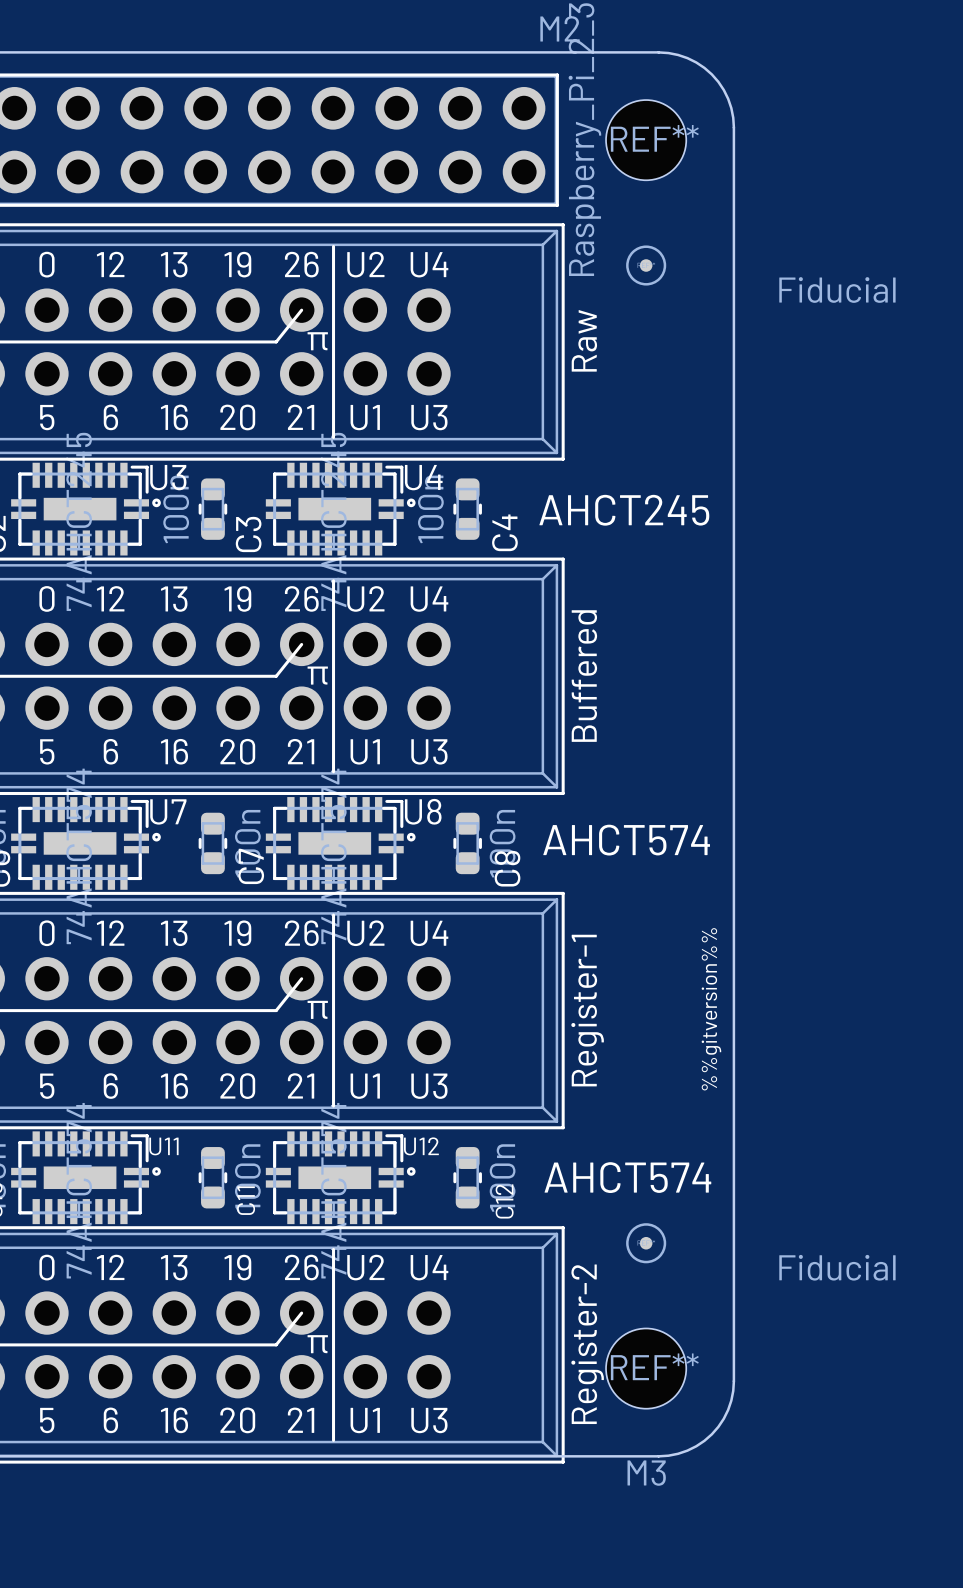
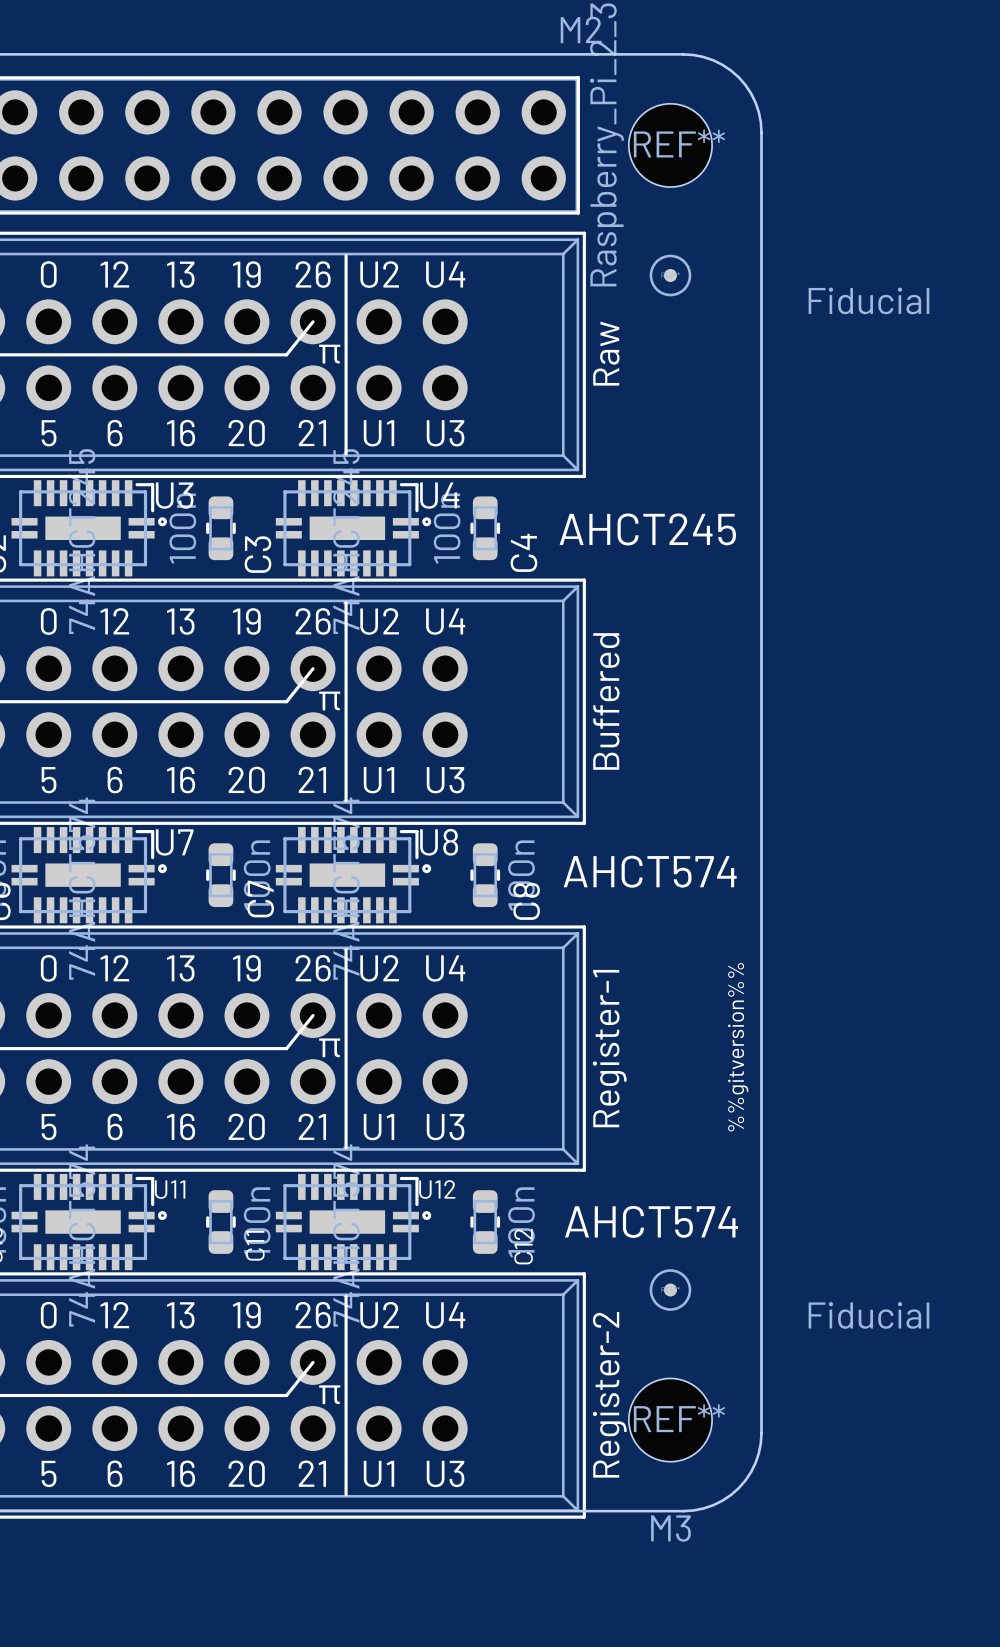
U3 footprint: [11, 462, 161, 556] -> [11, 480, 167, 577]
U4 footprint: [265, 462, 416, 556] -> [275, 480, 432, 577]
U7 footprint: [11, 797, 161, 890] -> [11, 827, 167, 924]
U8 footprint: [265, 797, 416, 890] -> [275, 827, 432, 924]
U11 footprint: [11, 1131, 161, 1225] -> [11, 1173, 167, 1271]
U12 footprint: [265, 1131, 416, 1225] -> [275, 1173, 432, 1271]

